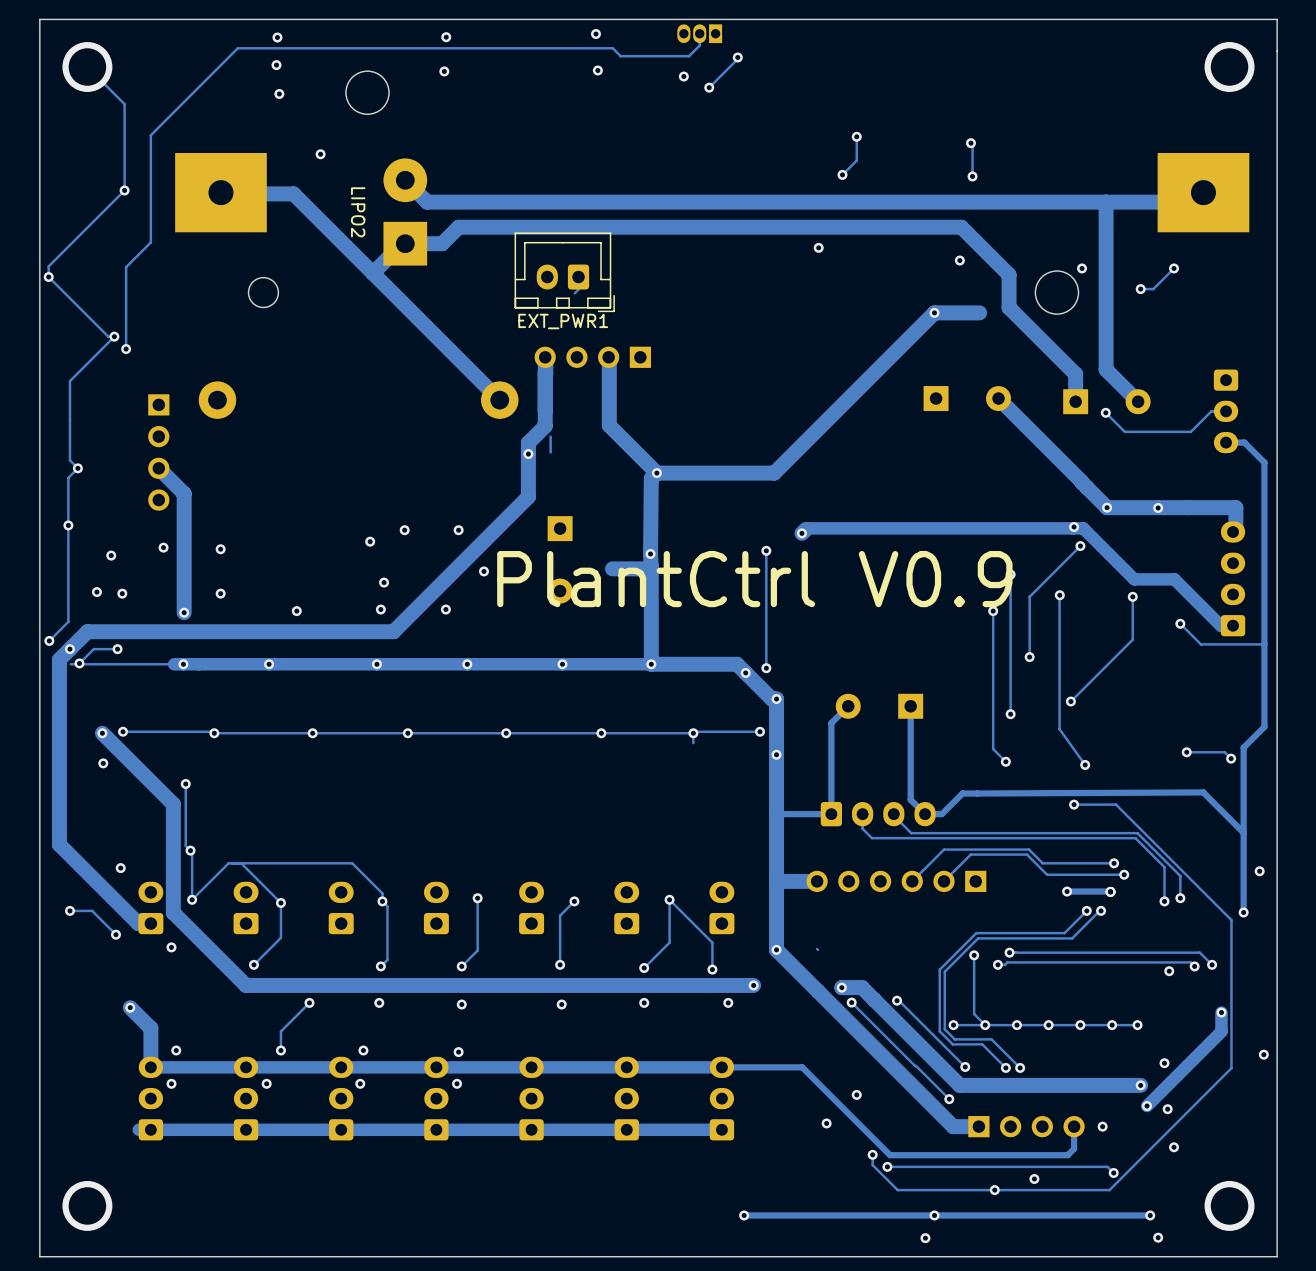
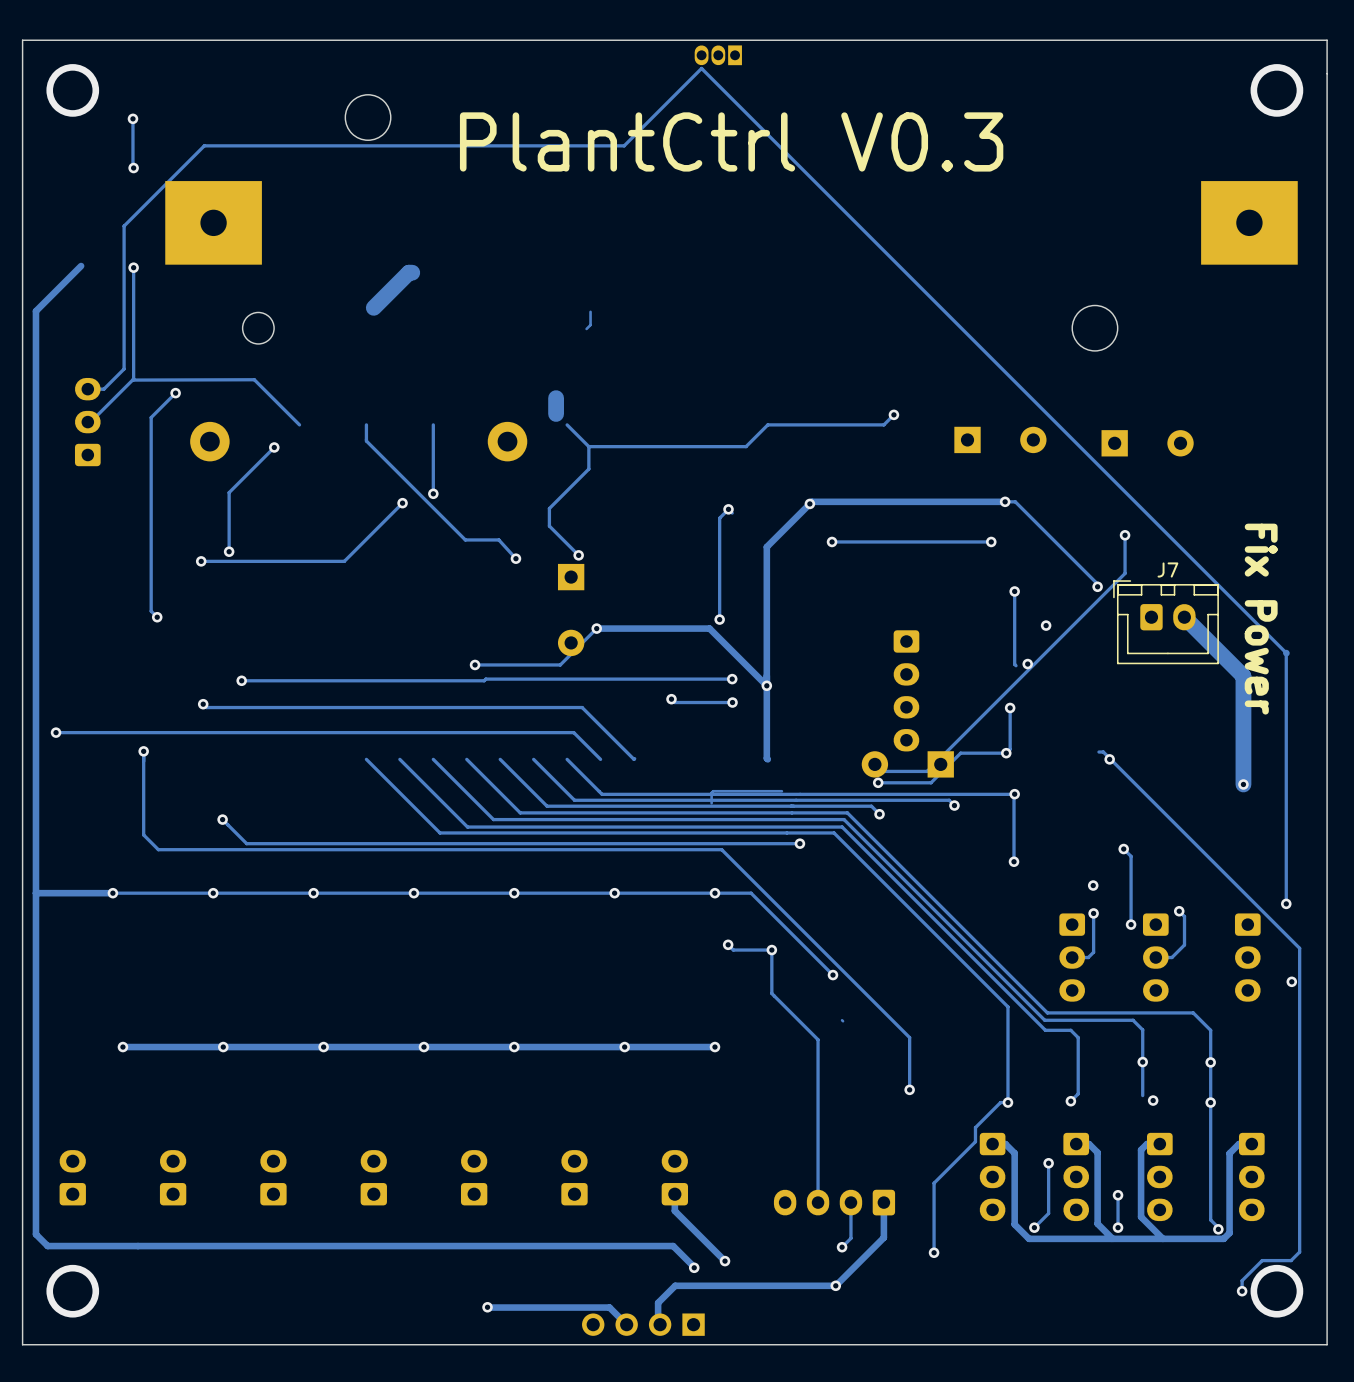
track: (699, 33) (699, 45) (689, 56) (620, 56) (612, 48) (237, 48) (150, 135) (150, 242) (126, 267) (126, 349) -> none
via: (595, 34) -> none
via: (277, 37) -> none
via: (446, 37) -> none
track: (737, 57) (709, 87) -> none
via: (737, 57) -> none
via: (276, 65) -> none
track: (87, 67) (124, 104) (124, 190) (48, 266) (48, 277) (108, 336) (114, 336) (69, 381) (69, 460) (77, 468) (68, 477) (68, 621) (49, 640) -> none
via: (597, 70) -> none
via: (444, 71) -> none
via: (683, 76) -> none
via: (709, 87) -> none
track: none -> (132, 118) (133, 168)
via: none -> (132, 118)
via: (279, 93) -> none
text: none -> PlantCtrl V0.3 (731, 141)
track: (856, 136) (856, 160) (842, 174) -> none
via: (856, 136) -> none
via: none -> (133, 168)
track: (970, 143) (972, 144) (972, 176) -> none
via: (970, 143) -> none
via: (320, 154) -> none
via: (842, 174) -> none
via: (972, 176) -> none
track: (405, 180) (427, 202) (1193, 202) (1203, 192) -> none
via: (124, 190) -> none
track: (214, 193) (293, 193) (499, 400) -> none
track: (1106, 202) (1106, 369) (1138, 401) -> none
LIPO2: (405, 211) -> none
track: none -> (81, 266) (35, 311) (35, 1234) (47, 1246) (673, 1246) (694, 1267)
track: none -> (133, 267) (132, 380)
via: none -> (133, 267)
track: (405, 243) (442, 243) (458, 227) (961, 227) (1009, 274) (1009, 307) (1075, 374) (1075, 401) -> none
via: (818, 247) -> none
via: (959, 260) -> none
via: (1082, 268) -> none
track: (1174, 268) (1153, 289) (1140, 289) -> none
via: (1174, 268) -> none
EXT_PWR1: (564, 272) -> none
via: (48, 277) -> none
via: (1140, 289) -> none
via: (934, 312) -> none
track: (979, 312) (934, 312) (774, 473) (656, 473) -> none
via: (114, 336) -> none
track: none -> (132, 380) (90, 422) (87, 422)
track: none -> (132, 380) (254, 379) (299, 424)
via: (126, 349) -> none
track: none -> (87, 389) (103, 389) (124, 369) (124, 226) (204, 145) (624, 145) (701, 68) (1286, 653) (1286, 903)
track: none -> (175, 393) (151, 417) (151, 611) (157, 617)
via: none -> (175, 393)
track: (545, 357) (545, 426) (528, 442) (528, 496) (393, 631) (87, 631) (59, 659) (59, 844) (138, 923) (150, 923) -> none
part: (592, 357) -> none
track: (609, 358) (609, 425) (656, 473) -> none
track: none -> (893, 414) (883, 424) (767, 424) (746, 446) (588, 446)
via: none -> (893, 414)
part: none -> (87, 422)
track: none -> (366, 424) (366, 441) (465, 539) (498, 539) (515, 558)
track: none -> (433, 424) (433, 493)
track: none -> (567, 424) (588, 446)
track: (998, 398) (1082, 482) -> none
track: none -> (588, 446) (588, 469) (549, 508) (549, 526) (578, 555)
track: none -> (274, 447) (229, 492) (229, 551)
via: none -> (274, 447)
track: (1226, 411) (1211, 411) (1190, 431) (1124, 431) (1106, 412) -> none
part: (1226, 411) -> none
via: (1105, 412) -> none
track: (550, 436) (550, 452) -> none
track: (1226, 442) (1244, 442) (1264, 462) (1264, 726) (1243, 747) (1243, 912) -> none
via: none -> (433, 493)
part: (158, 452) -> none
via: (528, 454) -> none
via: none -> (1005, 501)
track: none -> (402, 503) (344, 561) (201, 561)
via: none -> (402, 503)
via: none -> (809, 503)
via: none -> (728, 509)
track: none -> (732, 513) (728, 509) (719, 518) (719, 619)
via: (77, 468) -> none
track: (158, 468) (184, 493) (184, 612) -> none
track: (656, 473) (651, 478) (651, 567) -> none
via: (656, 473) -> none
track: (1082, 482) (1107, 507) (1235, 507) (1235, 533) -> none
track: none -> (1125, 535) (1125, 573) (927, 771) (866, 771)
via: none -> (1125, 535)
via: none -> (832, 541)
track: none -> (991, 541) (832, 541)
via: none -> (991, 541)
via: none -> (229, 551)
via: none -> (578, 555)
via: (1107, 507) -> none
via: (1158, 507) -> none
via: none -> (515, 558)
via: none -> (201, 561)
via: (68, 525) -> none
via: (1074, 527) -> none
track: (805, 529) (801, 533) (806, 528) (1083, 528) (1134, 579) (1174, 579) (1220, 625) (1233, 625) -> none
via: (404, 530) -> none
via: (458, 530) -> none
via: (801, 533) -> none
track: none -> (1097, 586) (1097, 584) (1015, 501) (811, 501) (766, 546) (767, 759) (767, 745)
via: none -> (1097, 586)
via: (370, 541) -> none
track: none -> (1014, 591) (1016, 665)
via: none -> (1014, 591)
track: (1080, 546) (1029, 596) (1029, 657) -> none
via: (1080, 546) -> none
via position: (163, 547) -> (157, 617)
via: (220, 549) -> none
track: (766, 550) (766, 668) -> none
via: (766, 550) -> none
via: (650, 553) -> none
via: (111, 555) -> none
track: none -> (1184, 617) (1243, 676) (1243, 784)
track: (651, 567) (612, 568) -> none
track: (651, 567) (651, 664) -> none
via: none -> (719, 619)
text: none -> Fix Power (1261, 619)
via: (483, 571) -> none
J7: none -> (1166, 622)
track: (1010, 574) (1010, 714) -> none
track: none -> (596, 628) (709, 628) (766, 685)
track: none -> (596, 628) (560, 664) (475, 664)
via: none -> (596, 628)
part: (1233, 578) -> none
text: PlantCtrl V0.9 (754, 579) -> none
via: (384, 582) -> none
via: (96, 592) -> none
via: (122, 593) -> none
via: (220, 593) -> none
track: (1059, 595) (1059, 729) (1085, 764) -> none
via: (1059, 595) -> none
track: (1132, 596) (1132, 639) (1070, 701) -> none
via: (1132, 596) -> none
via: (380, 609) -> none
via: (445, 609) -> none
via: (296, 611) -> none
via: none -> (475, 664)
track: (993, 611) (993, 749) (1005, 761) -> none
via: (184, 612) -> none
track: (1180, 623) (1200, 644) (1264, 644) -> none
via: (1180, 623) -> none
track: none -> (732, 679) (241, 680)
via: none -> (732, 679)
via: none -> (241, 680)
via: none -> (766, 685)
part: none -> (906, 690)
via: (49, 640) -> none
track: none -> (671, 699) (674, 702) (732, 702)
via: none -> (732, 702)
via: (69, 649) -> none
track: (117, 649) (93, 649) (79, 663) -> none
via: (117, 649) -> none
track: none -> (203, 704) (206, 707) (582, 707) (634, 758)
via: none -> (203, 704)
track: none -> (1010, 707) (1010, 749) (1006, 753) (960, 753) (931, 782) (878, 782)
via: none -> (1010, 707)
via: (1029, 657) -> none
via: (79, 663) -> none
track: (183, 664) (70, 664) -> none
via: (183, 664) -> none
via: (269, 664) -> none
via: (376, 664) -> none
via: (467, 664) -> none
via: (562, 664) -> none
track: (651, 664) (174, 664) -> none
track: (651, 664) (737, 664) (771, 699) (776, 699) (776, 949) (953, 1126) (978, 1126) -> none
via position: (651, 664) -> (671, 699)
via: (766, 668) -> none
via: (745, 672) -> none
track: none -> (56, 732) (573, 732) (600, 759)
via: none -> (56, 732)
track: none -> (143, 751) (143, 834) (158, 849) (721, 849) (909, 1037) (909, 1089)
via: none -> (143, 751)
track: none -> (1098, 752) (1103, 752) (1299, 948) (1299, 1252) (1291, 1260) (1262, 1260) (1242, 1280) (1242, 1291)
via: none -> (1006, 753)
via: (776, 699) -> none
track: none -> (366, 759) (440, 832) (834, 832) (1007, 1006) (1007, 1102) (1000, 1102) (975, 1127) (975, 1141) (934, 1183) (934, 1252)
track: none -> (399, 759) (467, 827) (842, 827) (1045, 1030) (1070, 1030) (1078, 1037) (1078, 1093) (1070, 1101)
track: none -> (433, 759) (493, 819) (844, 819) (1044, 1020) (1133, 1020) (1142, 1029) (1142, 1095)
track: none -> (466, 759) (520, 812) (847, 812) (1047, 1012) (1193, 1012) (1210, 1030) (1210, 1219) (1218, 1227)
track: none -> (500, 759) (547, 806) (871, 806) (879, 814)
track: none -> (533, 759) (574, 800) (949, 800) (954, 805)
track: none -> (567, 759) (602, 794) (1014, 794)
track: (848, 706) (831, 723) (831, 814) (776, 813) -> none
track: (910, 706) (910, 799) (925, 814) (941, 814) (962, 793) (1203, 792) (1243, 832) -> none
via: (1010, 714) -> none
via: none -> (878, 782)
via: none -> (1243, 784)
track: (123, 731) (693, 733) -> none
via: (123, 731) -> none
via: (760, 731) -> none
track: (102, 733) (173, 804) (173, 912) (246, 985) (753, 985) -> none
via: (102, 733) -> none
via: (214, 733) -> none
via: (312, 733) -> none
via: (407, 733) -> none
via: (506, 733) -> none
via: (601, 733) -> none
via: (693, 733) -> none
track: none -> (1014, 794) (1014, 861)
via: none -> (1014, 794)
via: none -> (954, 805)
track: (1186, 752) (1224, 752) (1231, 758) -> none
via: (1186, 752) -> none
via: none -> (879, 814)
via: (776, 754) -> none
track: none -> (222, 819) (246, 843) (799, 843)
via: none -> (222, 819)
via: (1231, 758) -> none
via: (1005, 761) -> none
via: (103, 763) -> none
via: (1085, 764) -> none
via: none -> (799, 843)
track: (185, 784) (185, 845) (192, 852) (192, 899) (228, 863) (352, 863) (382, 893) (382, 901) (387, 906) (387, 959) (380, 966) -> none
via: (185, 784) -> none
track: none -> (1123, 849) (1131, 856) (1131, 924)
via: none -> (1123, 849)
via: none -> (1014, 861)
track: (1074, 804) (1116, 804) (1231, 920) (1231, 1068) (1109, 1190) (897, 1190) (872, 1165) (872, 1154) -> none
via: (1074, 804) -> none
track: (862, 814) (862, 828) (871, 838) (1135, 838) (1164, 867) (1164, 901) -> none
part: (878, 814) -> none
track: (893, 814) (911, 833) (1137, 833) (1180, 876) (1180, 898) -> none
via: none -> (1093, 885)
track: none -> (35, 893) (751, 893) (832, 975)
via: none -> (112, 893)
via: none -> (213, 893)
via: none -> (313, 893)
via: none -> (413, 893)
via: none -> (514, 893)
via: none -> (614, 893)
via: none -> (714, 893)
track: none -> (1179, 911) (1184, 916) (1184, 944) (1171, 957) (1155, 957)
via: none -> (1179, 911)
track: none -> (1093, 913) (1093, 952) (1088, 957) (1072, 957)
via: none -> (1093, 913)
via: (190, 850) -> none
via: none -> (1131, 924)
track: (241, 863) (280, 902) (280, 937) (253, 964) -> none
track: (1114, 863) (1042, 863) (1029, 849) (944, 849) (912, 881) -> none
via: (1114, 863) -> none
via: (120, 868) -> none
via position: (1259, 871) -> (1286, 903)
track: (1124, 874) (1047, 874) (1026, 854) (970, 854) (944, 881) -> none
via: (1124, 874) -> none
track: none -> (728, 944) (733, 950) (771, 950) (771, 993) (818, 1039) (818, 1202)
via: none -> (728, 944)
track: (776, 880) (817, 881) -> none
part: (896, 881) -> none
via: none -> (771, 950)
part: none -> (1072, 957)
part: none -> (1155, 957)
part: none -> (1247, 957)
track: (1067, 891) (1110, 891) -> none
via: (1067, 891) -> none
via: (1110, 891) -> none
track: (477, 898) (477, 950) (461, 966) -> none
via: (477, 898) -> none
via: (1180, 898) -> none
via: (192, 899) -> none
via: (669, 899) -> none
via: (382, 901) -> none
track: (574, 901) (560, 915) (560, 964) -> none
via: (574, 901) -> none
via: (1164, 901) -> none
via: (280, 902) -> none
via: none -> (832, 975)
part: (150, 907) -> none
part: (246, 907) -> none
part: (341, 907) -> none
part: (436, 907) -> none
part: (531, 907) -> none
part: (626, 907) -> none
part: (721, 907) -> none
track: (69, 910) (92, 910) (115, 934) -> none
via: (69, 910) -> none
track: (1086, 910) (1064, 933) (976, 933) (939, 969) (939, 1031) (952, 1044) (982, 1044) (1005, 1067) -> none
via: (1086, 910) -> none
track: (1101, 910) (1072, 938) (978, 938) (944, 971) (944, 1029) (954, 1039) (991, 1039) (1020, 1067) -> none
via: (1101, 910) -> none
via: (115, 934) -> none
via: (171, 947) -> none
via: (776, 949) -> none
track: (1009, 952) (1199, 952) (1212, 964) -> none
via: (1009, 952) -> none
track: (974, 955) (974, 1014) (985, 1025) -> none
via: (974, 955) -> none
via position: (253, 964) -> (223, 1047)
via: (560, 964) -> none
track: (997, 964) (1005, 964) (1007, 962) (1190, 962) (1194, 966) -> none
via: (997, 964) -> none
via: (1212, 964) -> none
via: (380, 966) -> none
via: (461, 966) -> none
via: (1194, 966) -> none
track: (644, 968) (669, 942) (669, 899) (712, 942) (712, 969) -> none
via: (644, 968) -> none
via position: (712, 969) -> (714, 1047)
via: (1169, 971) -> none
via: none -> (122, 1047)
via: none -> (323, 1047)
via: none -> (423, 1047)
via: none -> (514, 1047)
via: none -> (624, 1047)
track: none -> (714, 1047) (122, 1047)
via: (753, 985) -> none
track: (841, 987) (862, 987) (959, 1085) (1140, 1085) -> none
via: (841, 987) -> none
via: none -> (1142, 1062)
via: none -> (1210, 1062)
track: (897, 1000) (965, 1067) -> none
via: (897, 1000) -> none
track: (309, 1002) (280, 1031) (280, 1050) -> none
via: (309, 1002) -> none
via: (379, 1002) -> none
via: (644, 1002) -> none
via: (728, 1002) -> none
track: (851, 1002) (949, 1099) -> none
via: (851, 1002) -> none
via: (461, 1004) -> none
via: (561, 1004) -> none
track: (130, 1007) (150, 1028) (150, 1067) -> none
via: (130, 1007) -> none
track: (1221, 1012) (1221, 1031) (1147, 1106) -> none
via: (1221, 1012) -> none
via: none -> (909, 1089)
via: (953, 1025) -> none
via: (985, 1025) -> none
via: (1016, 1025) -> none
via: none -> (1070, 1101)
via: (1048, 1025) -> none
via: (1080, 1025) -> none
track: (1137, 1025) (953, 1025) -> none
via: (1137, 1025) -> none
via: none -> (1007, 1102)
via: none -> (1210, 1102)
via: (176, 1050) -> none
via: (280, 1050) -> none
via: (363, 1050) -> none
via: (458, 1052) -> none
via: (1263, 1054) -> none
via: (1164, 1063) -> none
track: none -> (992, 1144) (1005, 1144) (1014, 1153) (1014, 1224) (1029, 1238) (1112, 1238)
track: none -> (1159, 1144) (1147, 1144) (1141, 1149) (1141, 1216) (1162, 1238)
track: none -> (1251, 1144) (1238, 1144) (1229, 1153) (1229, 1233) (1223, 1238) (1112, 1238) (1097, 1223) (1097, 1152) (1089, 1144) (1076, 1144)
track: (150, 1067) (802, 1067) (890, 1155) (1067, 1155) (1074, 1148) (1074, 1126) -> none
track: (721, 1067) (150, 1067) -> none
via: (965, 1067) -> none
via: (1005, 1067) -> none
via: (1020, 1067) -> none
via: (171, 1083) -> none
via: (266, 1083) -> none
via: (360, 1083) -> none
via: (457, 1083) -> none
track: none -> (1048, 1163) (1048, 1213) (1034, 1227)
via: none -> (1048, 1163)
via: (1140, 1085) -> none
via: (856, 1094) -> none
part: none -> (992, 1176)
part: none -> (1076, 1176)
part: none -> (1159, 1176)
part: none -> (1251, 1176)
part: none -> (72, 1177)
part: (150, 1098) -> none
part: none -> (173, 1177)
part: (246, 1098) -> none
part: none -> (273, 1177)
part: (341, 1098) -> none
part: none -> (373, 1177)
part: (436, 1098) -> none
part: none -> (474, 1177)
part: (531, 1098) -> none
part: none -> (574, 1177)
part: (626, 1098) -> none
part: none -> (674, 1177)
part: (721, 1098) -> none
via: (949, 1099) -> none
via: (1147, 1106) -> none
via: (1167, 1109) -> none
track: none -> (674, 1194) (674, 1210) (725, 1261)
track: none -> (1118, 1195) (1118, 1227)
via: none -> (1118, 1195)
part: none -> (834, 1202)
track: none -> (850, 1202) (850, 1238) (842, 1247)
track: none -> (883, 1202) (883, 1237) (835, 1285) (675, 1285) (658, 1302) (658, 1314)
via: (826, 1123) -> none
part: (1026, 1126) -> none
via: (1102, 1126) -> none
track: (721, 1129) (138, 1129) -> none
via: none -> (1034, 1227)
via: none -> (1118, 1227)
via: (872, 1154) -> none
via: none -> (842, 1247)
track: (887, 1166) (1107, 1166) (1113, 1172) -> none
via position: (887, 1166) -> (934, 1252)
via: (1113, 1172) -> none
via: none -> (725, 1261)
via: (1034, 1178) -> none
via: none -> (694, 1267)
via: (994, 1190) -> none
via: none -> (835, 1285)
via: none -> (1242, 1291)
via: (744, 1215) -> none
via: (934, 1215) -> none
track: (1150, 1215) (744, 1215) -> none
via: (1150, 1215) -> none
track: none -> (486, 1307) (609, 1307) (626, 1324)
via: none -> (487, 1307)
part: none -> (643, 1324)
via: (1158, 1237) -> none
via: (925, 1238) -> none

